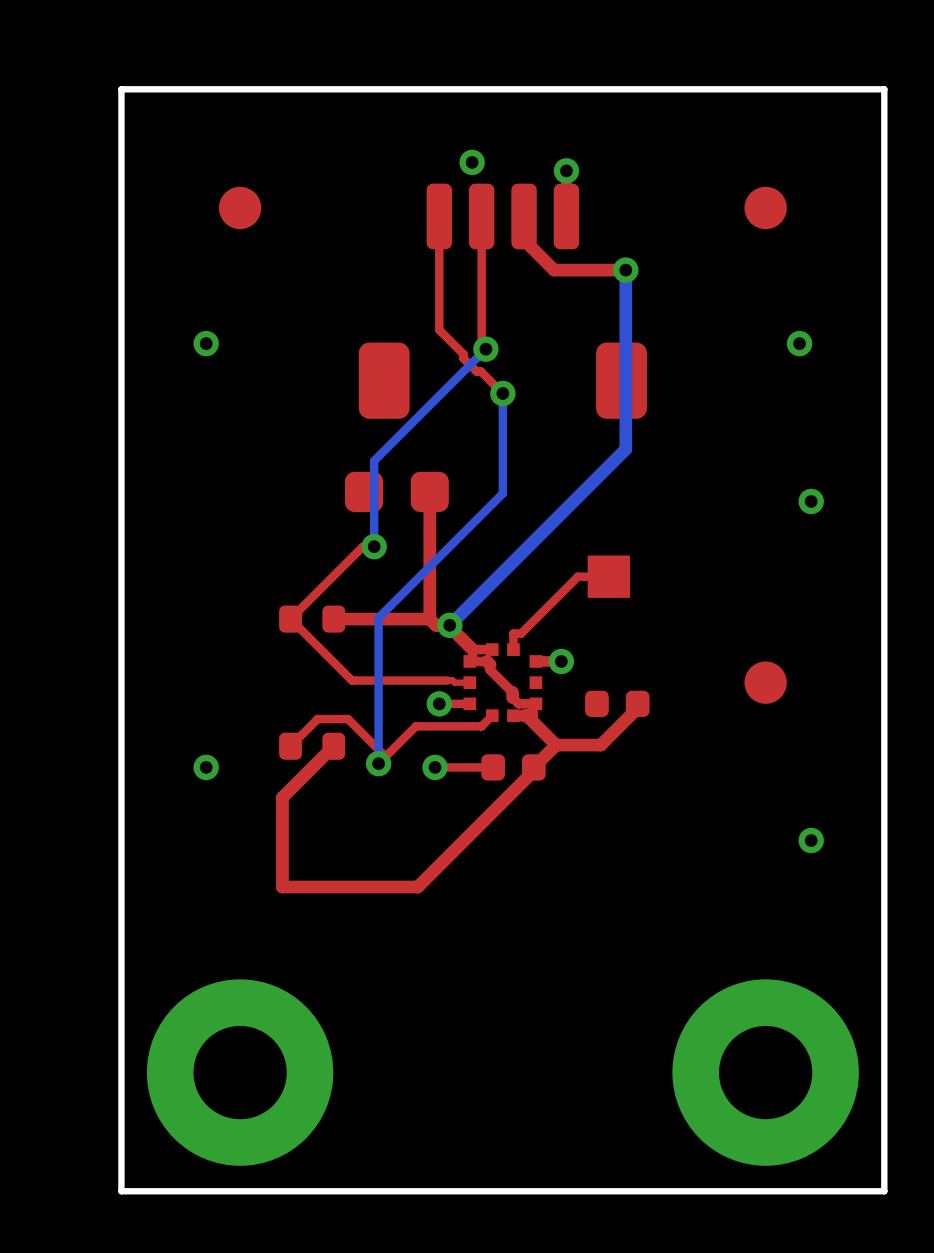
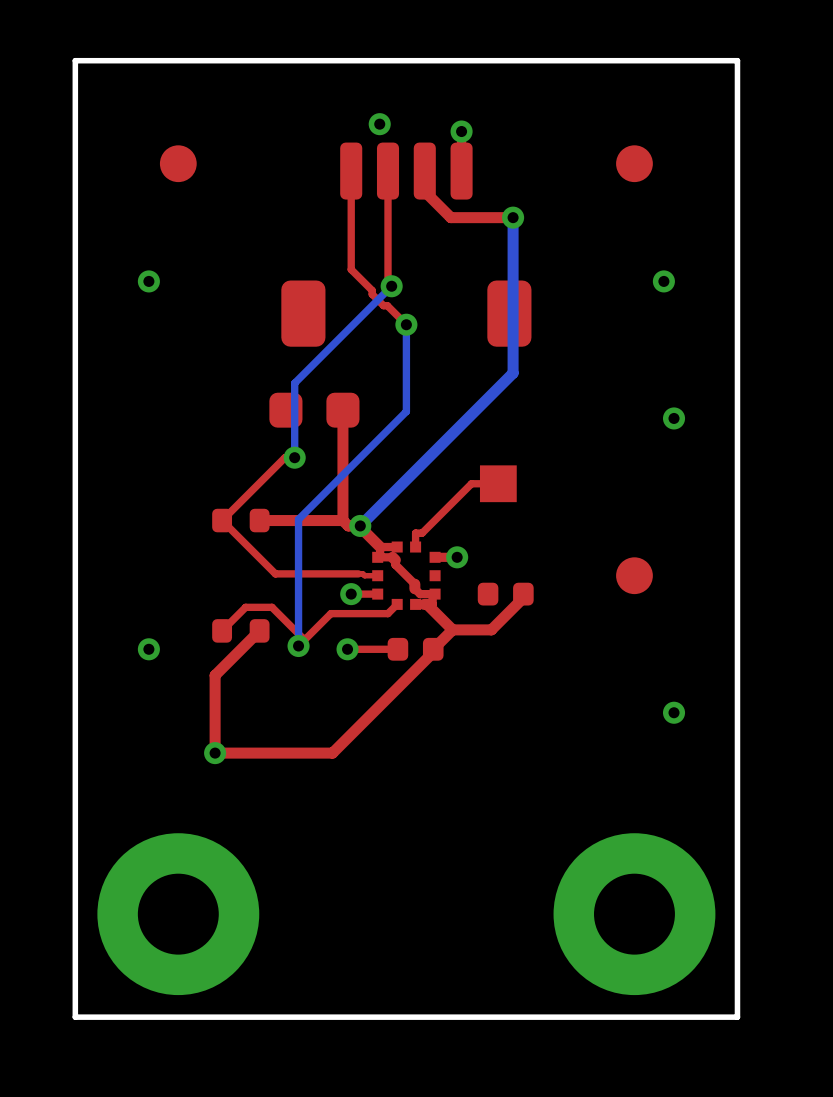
via: none -> (215, 753)

